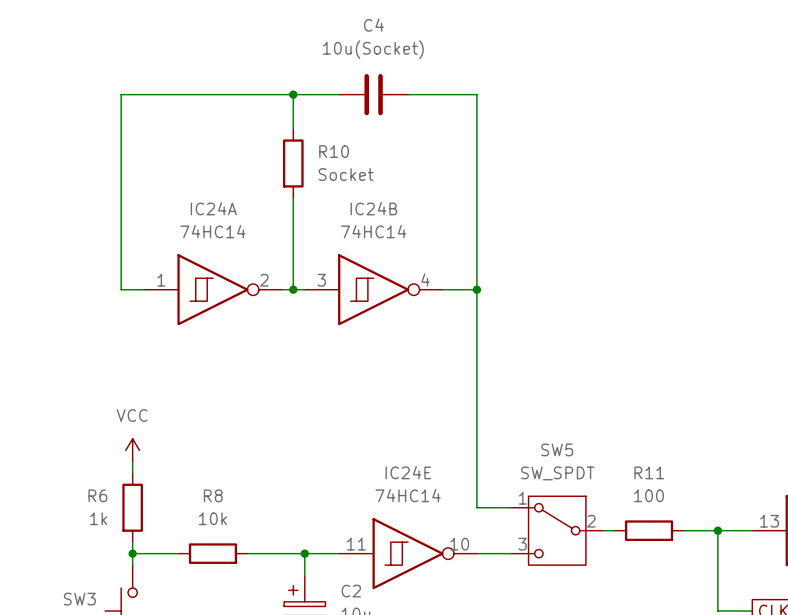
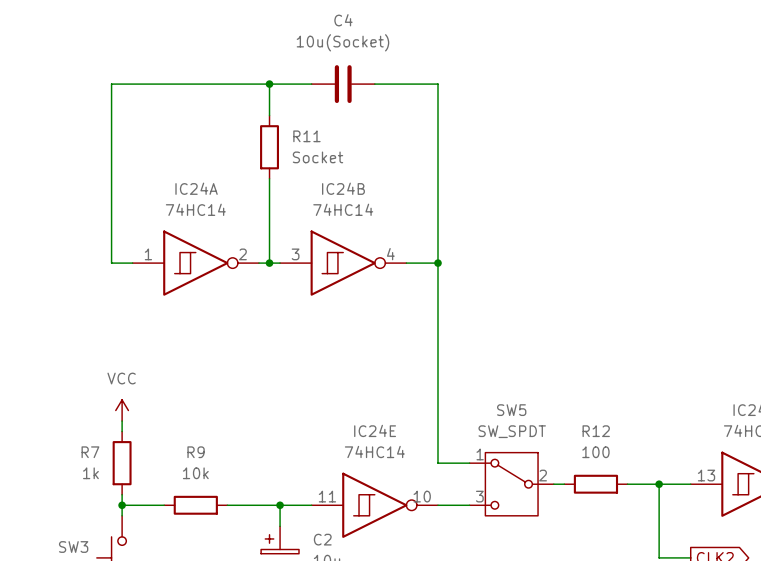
R10 name: R10 (334, 151) -> R11 (306, 136)
R11 name: R11 (649, 472) -> R12 (596, 431)
R6 name: R6 (97, 495) -> R7 (90, 452)
R8 name: R8 (213, 495) -> R9 (196, 452)

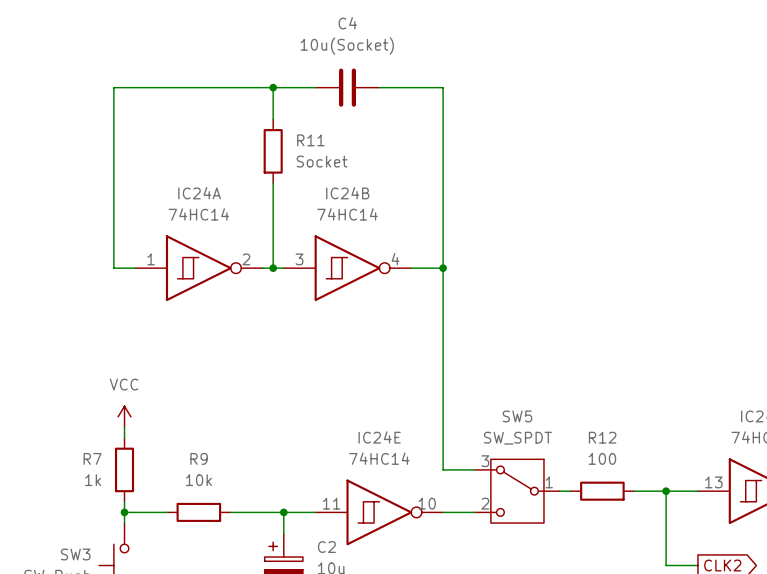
SW5 pin number: 1 (480, 454) -> 3 (485, 461)
SW5 pin number: 2 (543, 475) -> 1 (549, 482)
SW5 pin number: 3 (479, 496) -> 2 (485, 503)

